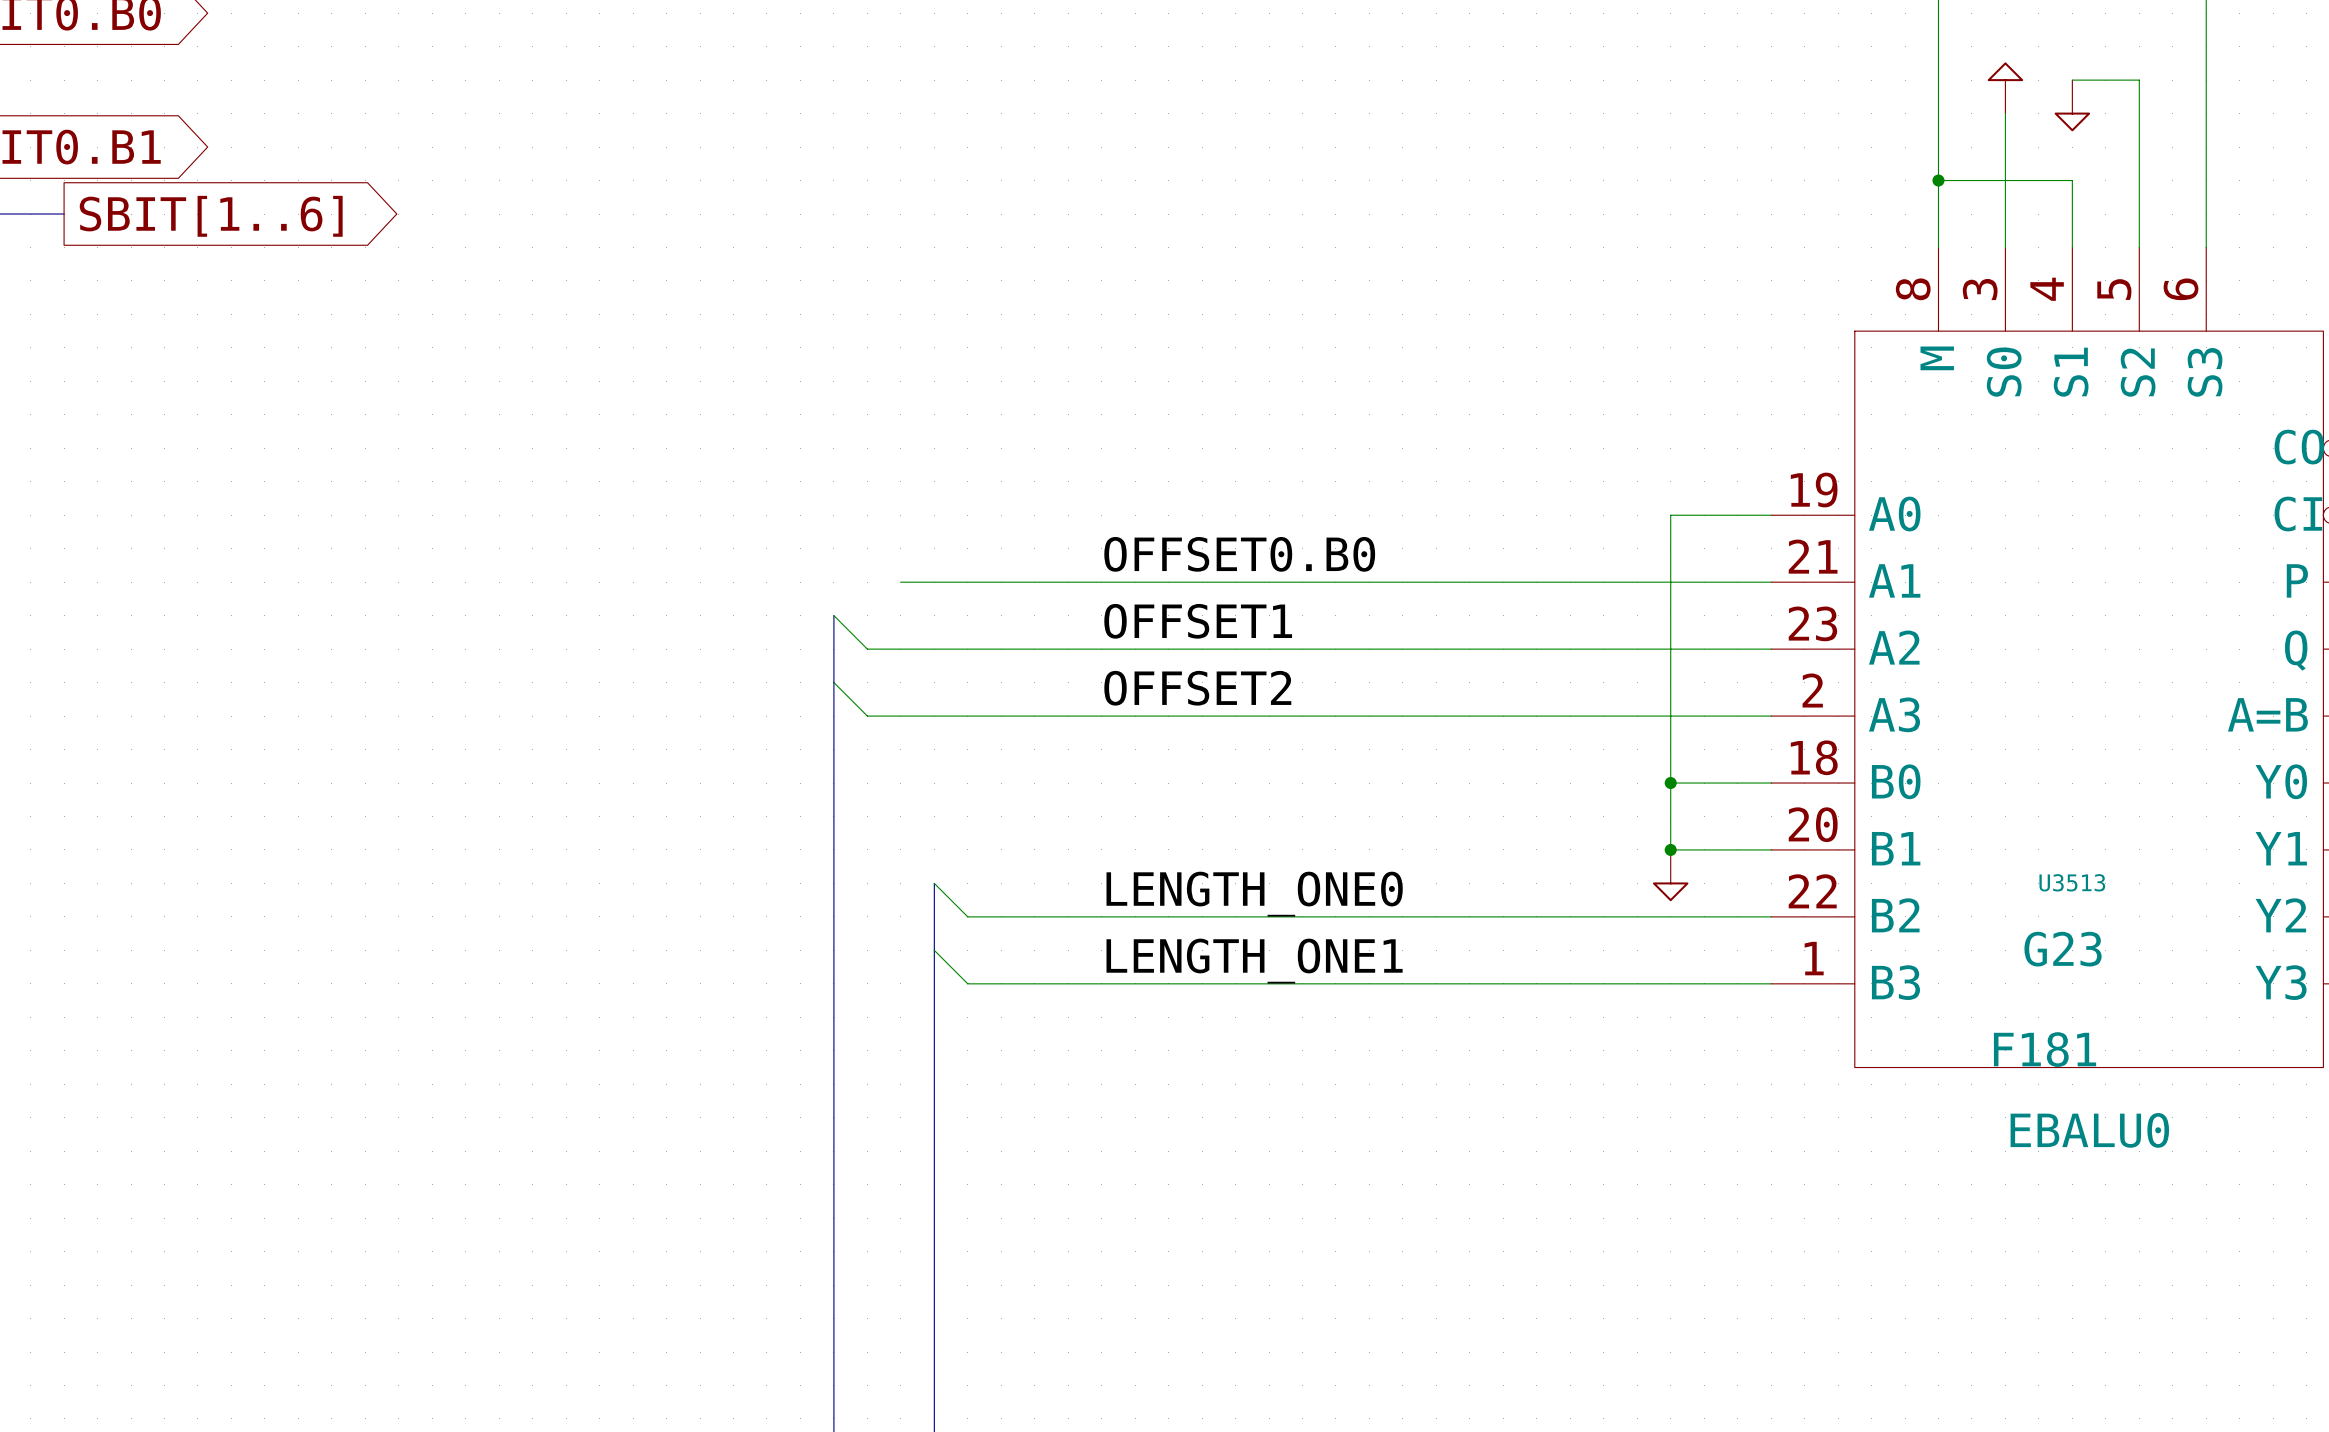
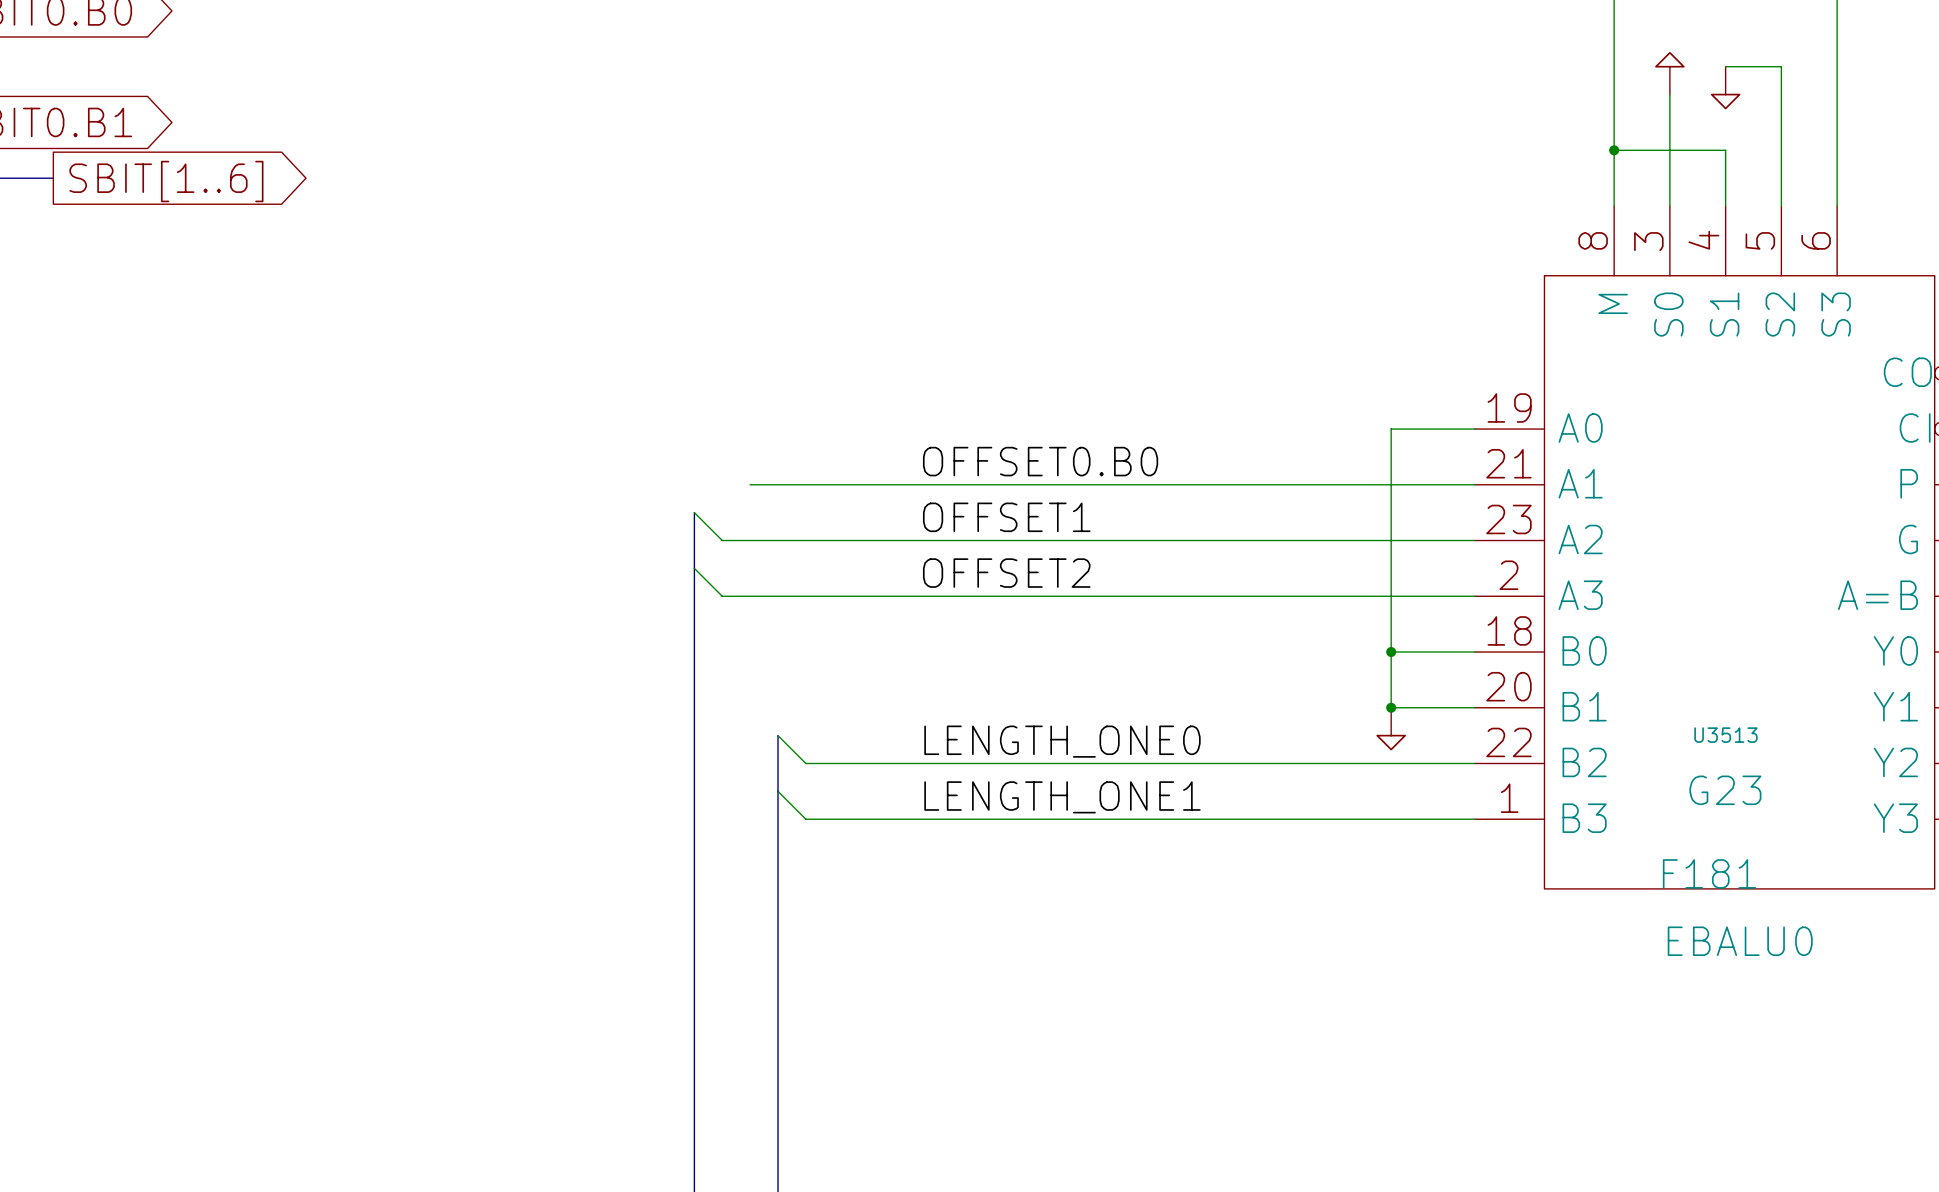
U3513 pin name: Q (2296, 650) -> G (1908, 539)

